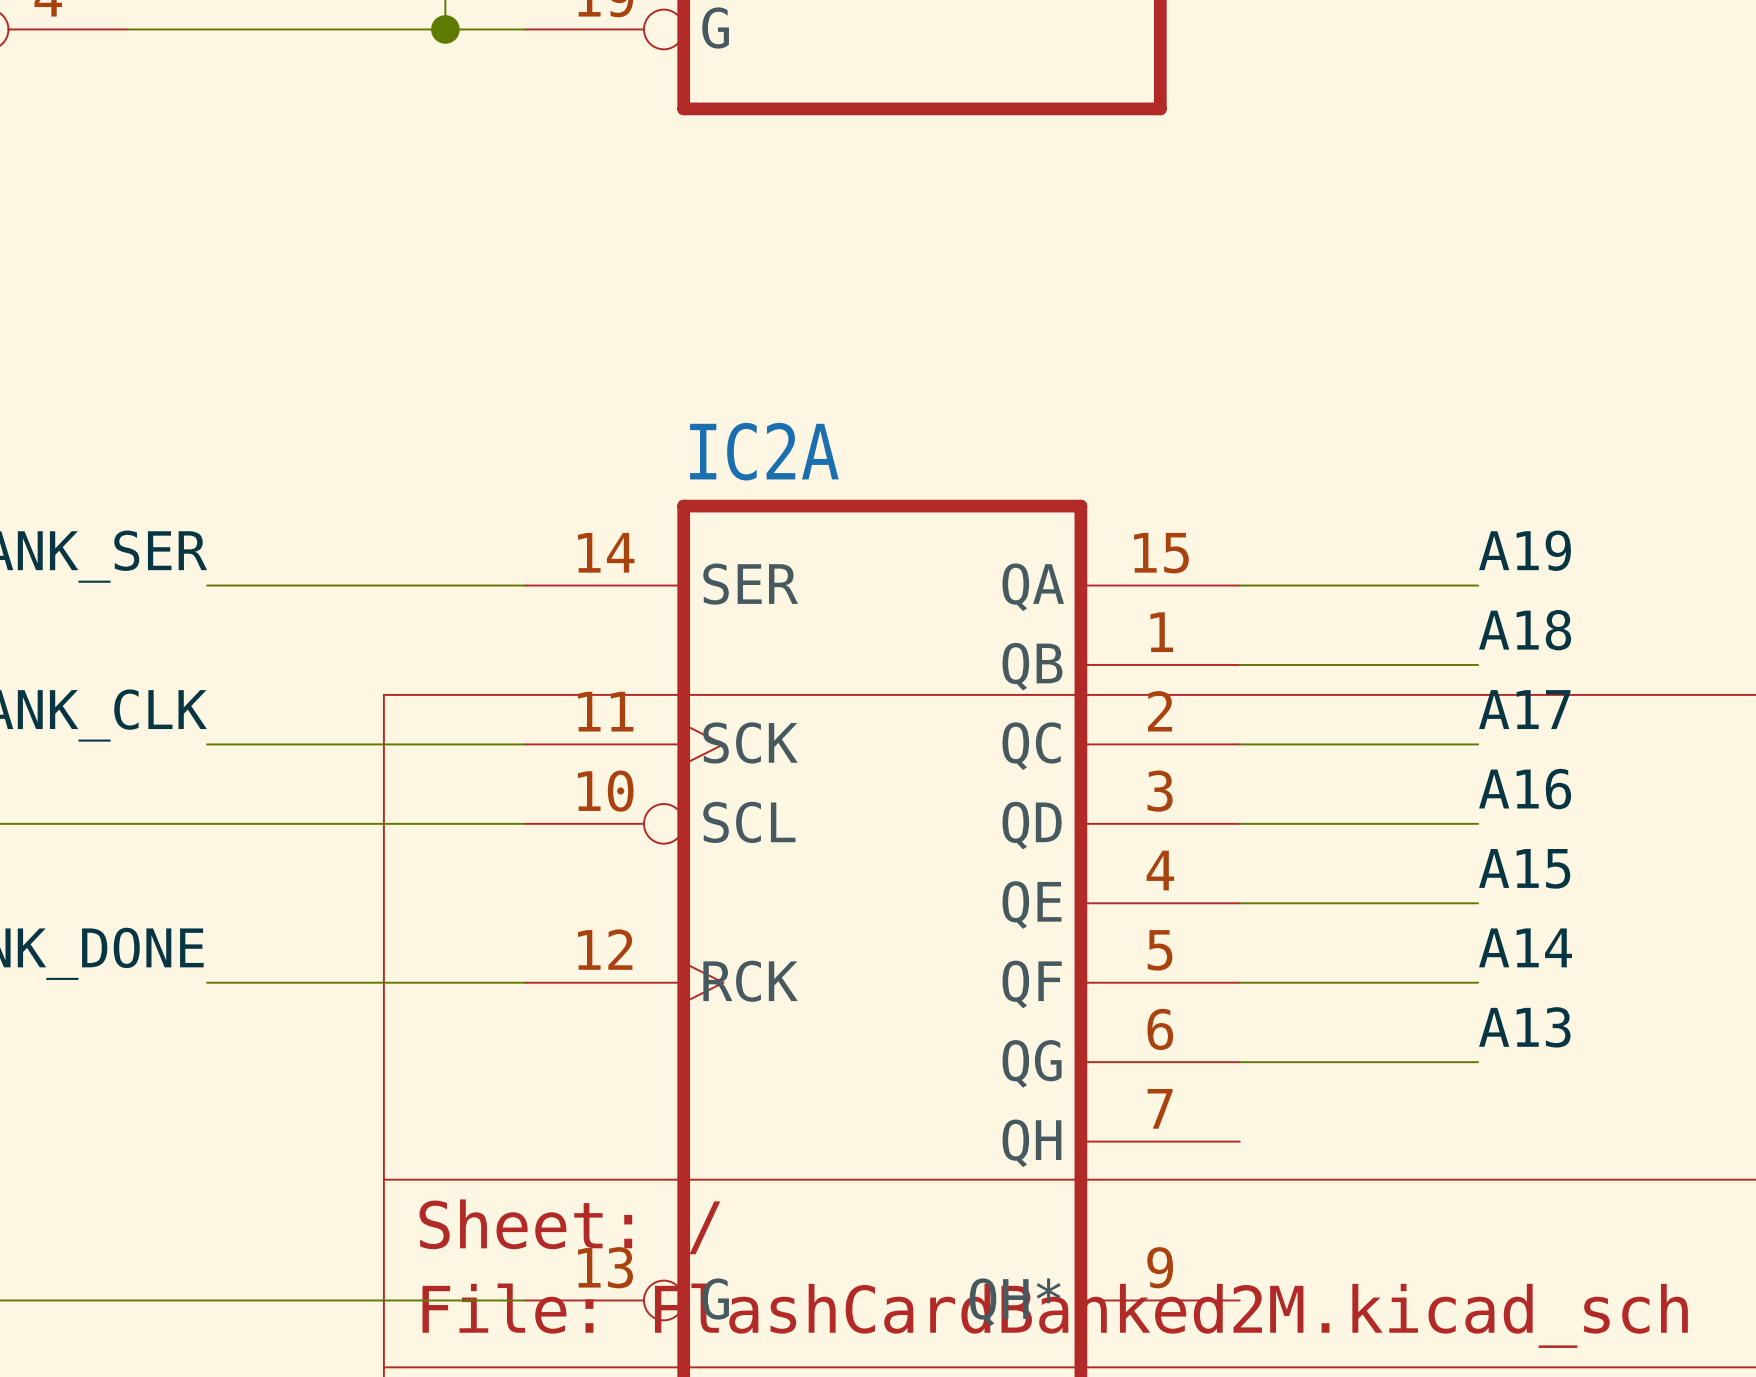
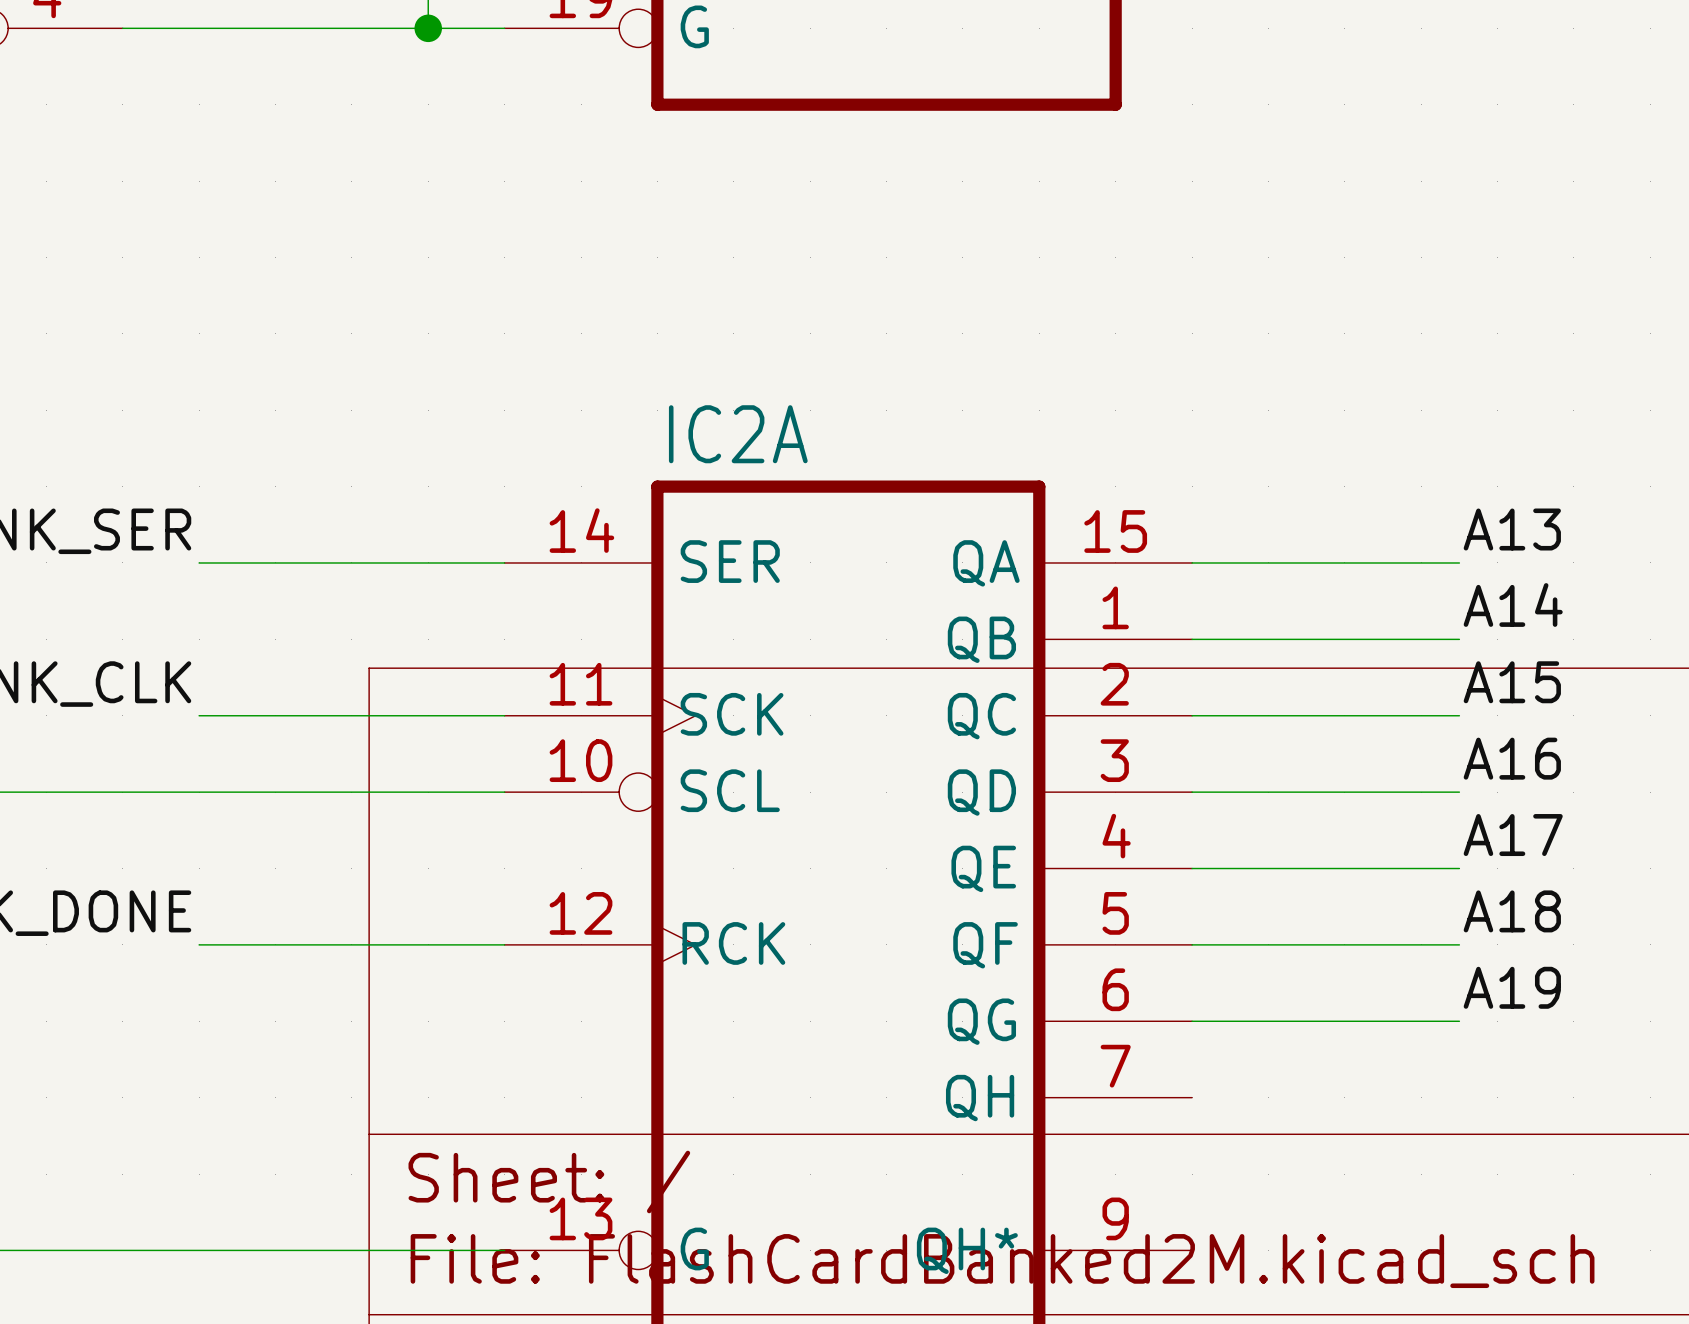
label position: A19 (1524, 550) -> A19 (1512, 987)
wire: none -> (1421, 562) (1459, 562)
label position: A18 (1525, 630) -> A18 (1512, 911)
wire: none -> (1421, 639) (1459, 639)
label position: A17 (1524, 709) -> A17 (1513, 835)
wire: none -> (1421, 715) (1459, 715)
label position: A16 (1525, 789) -> A16 (1512, 758)
wire: none -> (1421, 792) (1459, 792)
label position: A15 (1524, 868) -> A15 (1512, 682)
wire: none -> (1421, 868) (1459, 868)
label position: A14 (1525, 947) -> A14 (1513, 604)
wire: none -> (1421, 944) (1459, 944)
label position: A13 (1524, 1027) -> A13 (1512, 529)
wire: none -> (1421, 1021) (1459, 1021)

